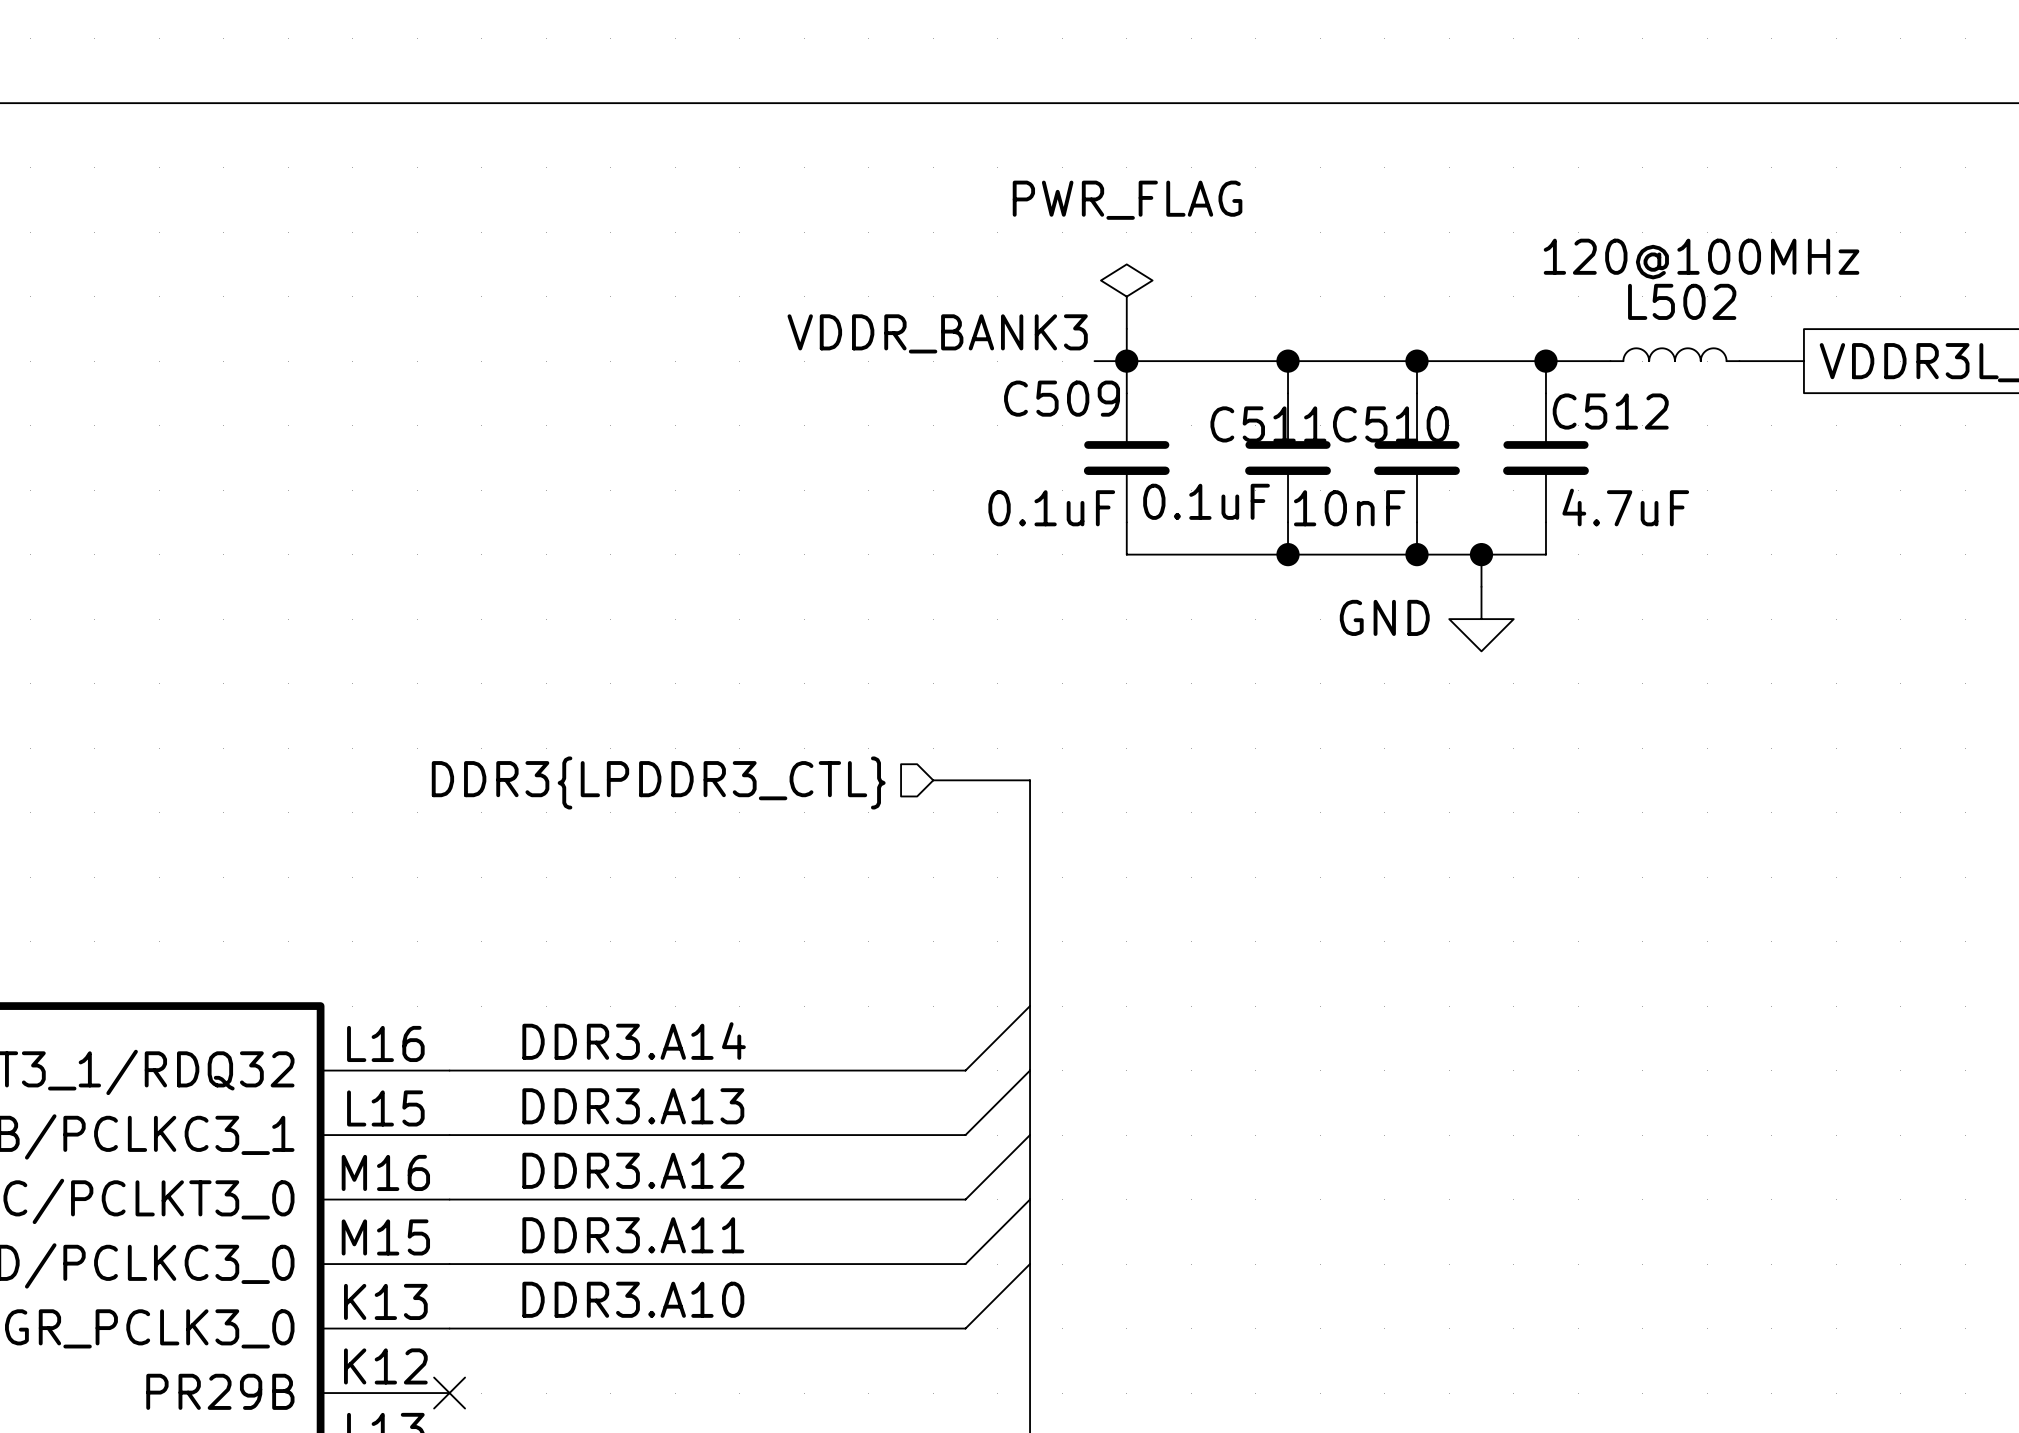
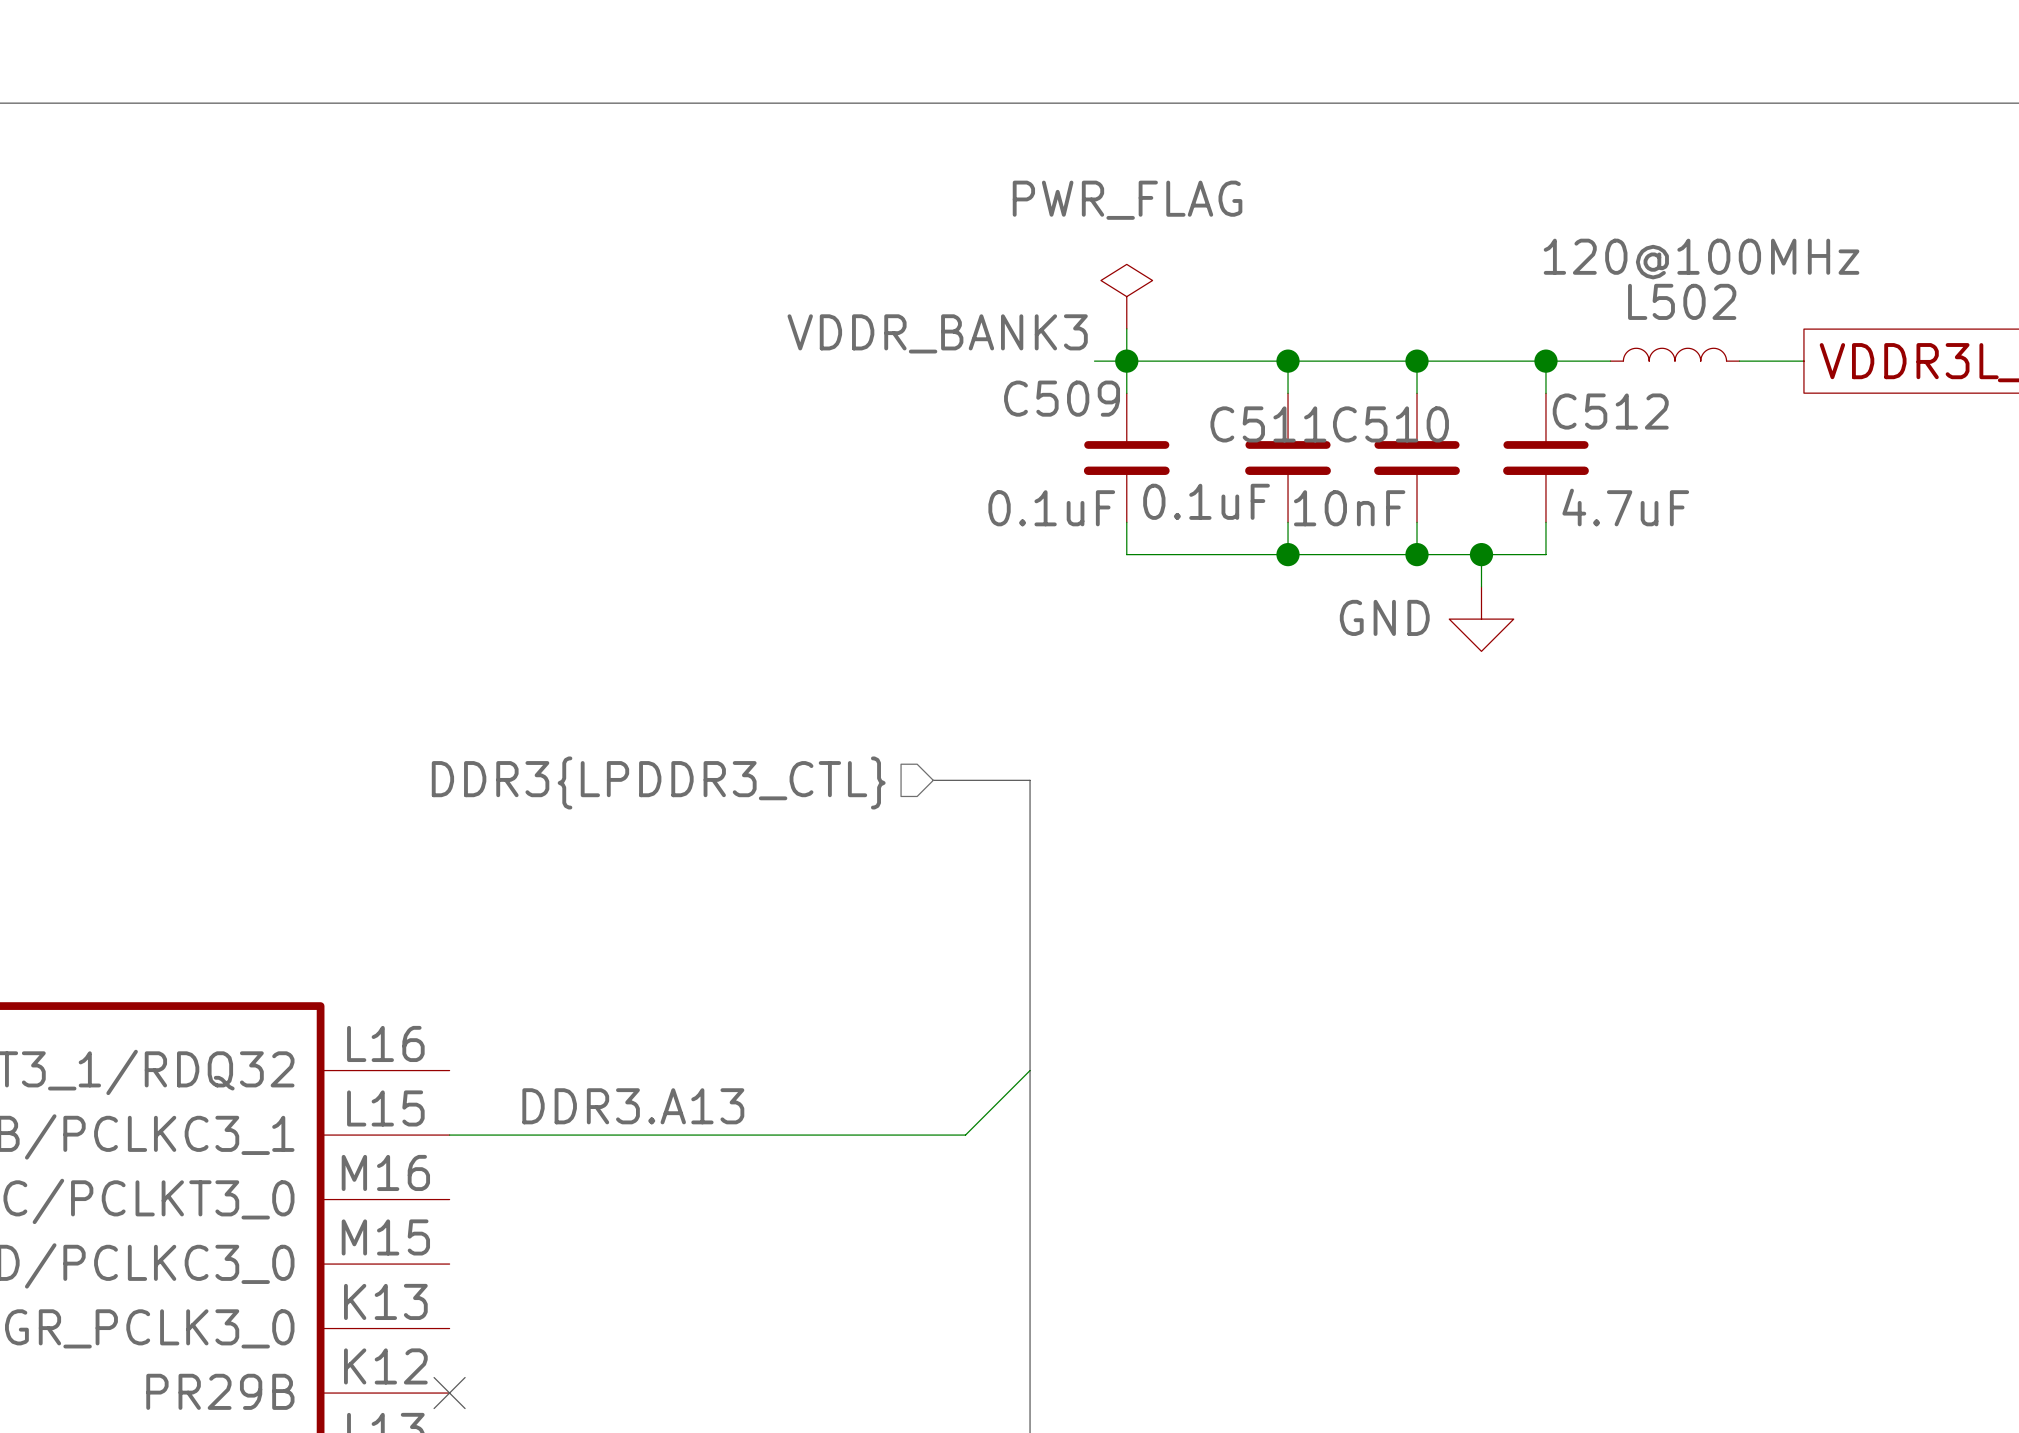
wire: (1030, 1006) (965, 1070) (449, 1070) -> none
label: DDR3.A14 (634, 1041) -> none
wire: (1030, 1135) (965, 1199) (449, 1199) -> none
label: DDR3.A12 (633, 1170) -> none
wire: (1030, 1199) (965, 1264) (449, 1264) -> none
label: DDR3.A11 (633, 1235) -> none
wire: (1030, 1264) (965, 1328) (449, 1328) -> none
label: DDR3.A10 (633, 1299) -> none

